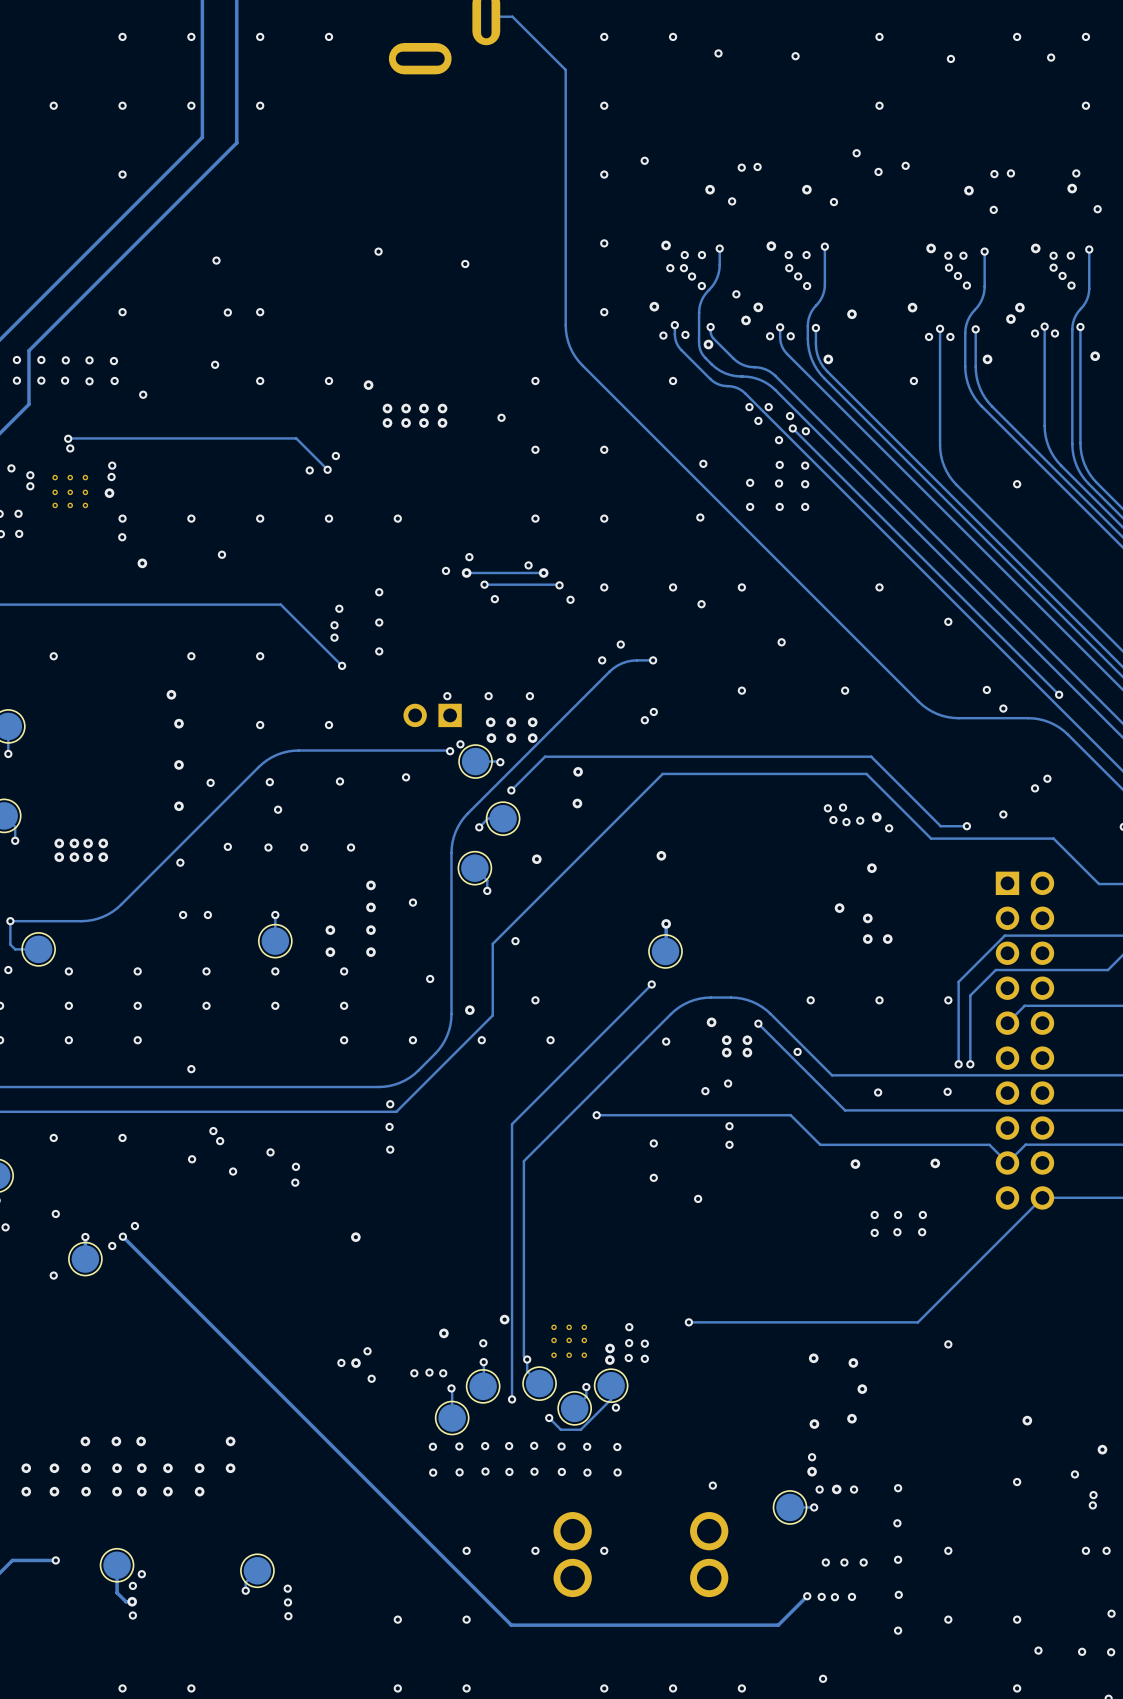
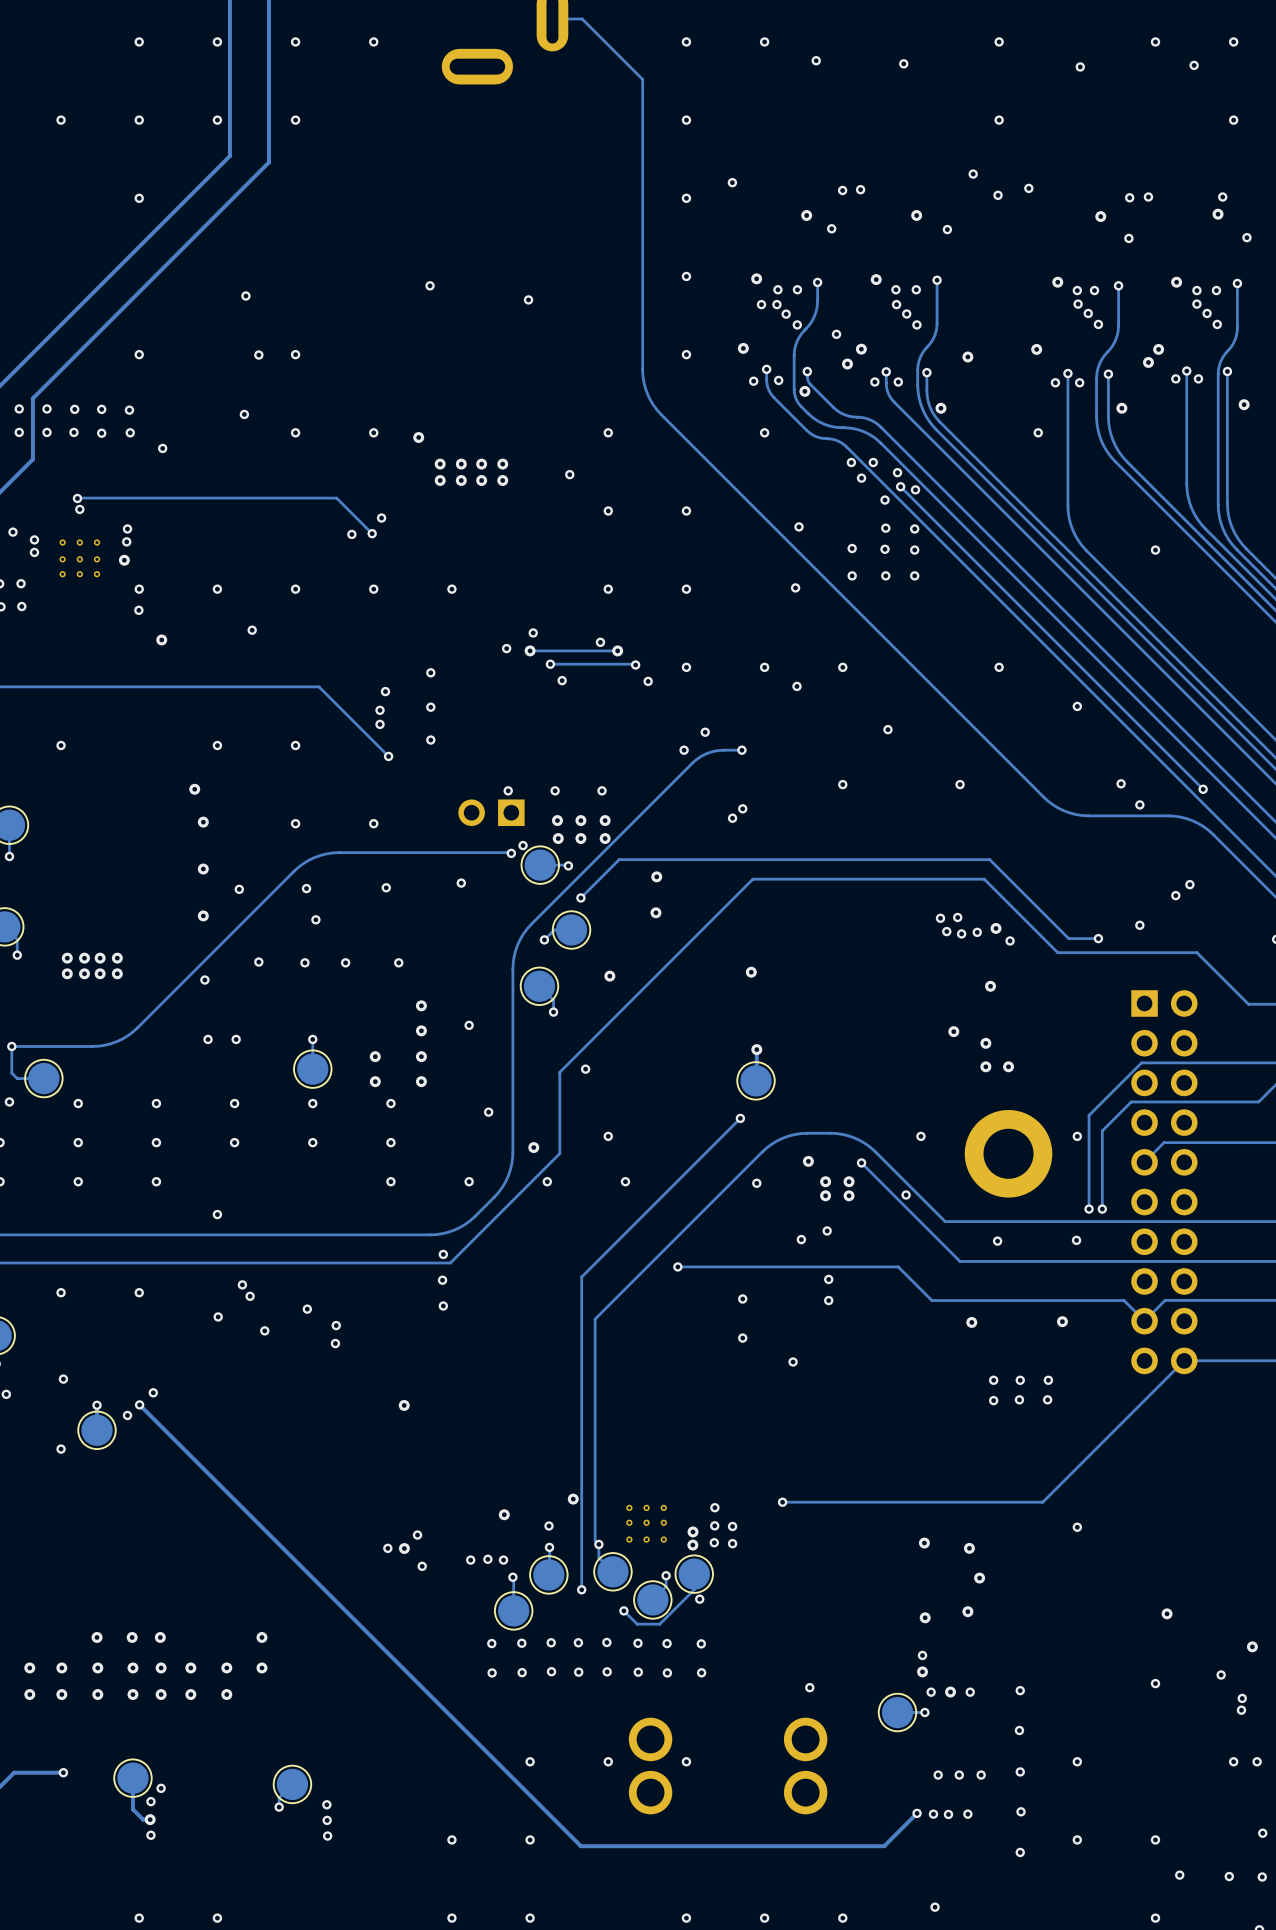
via: (879, 1000) -> none
part: none -> (1008, 1153)

